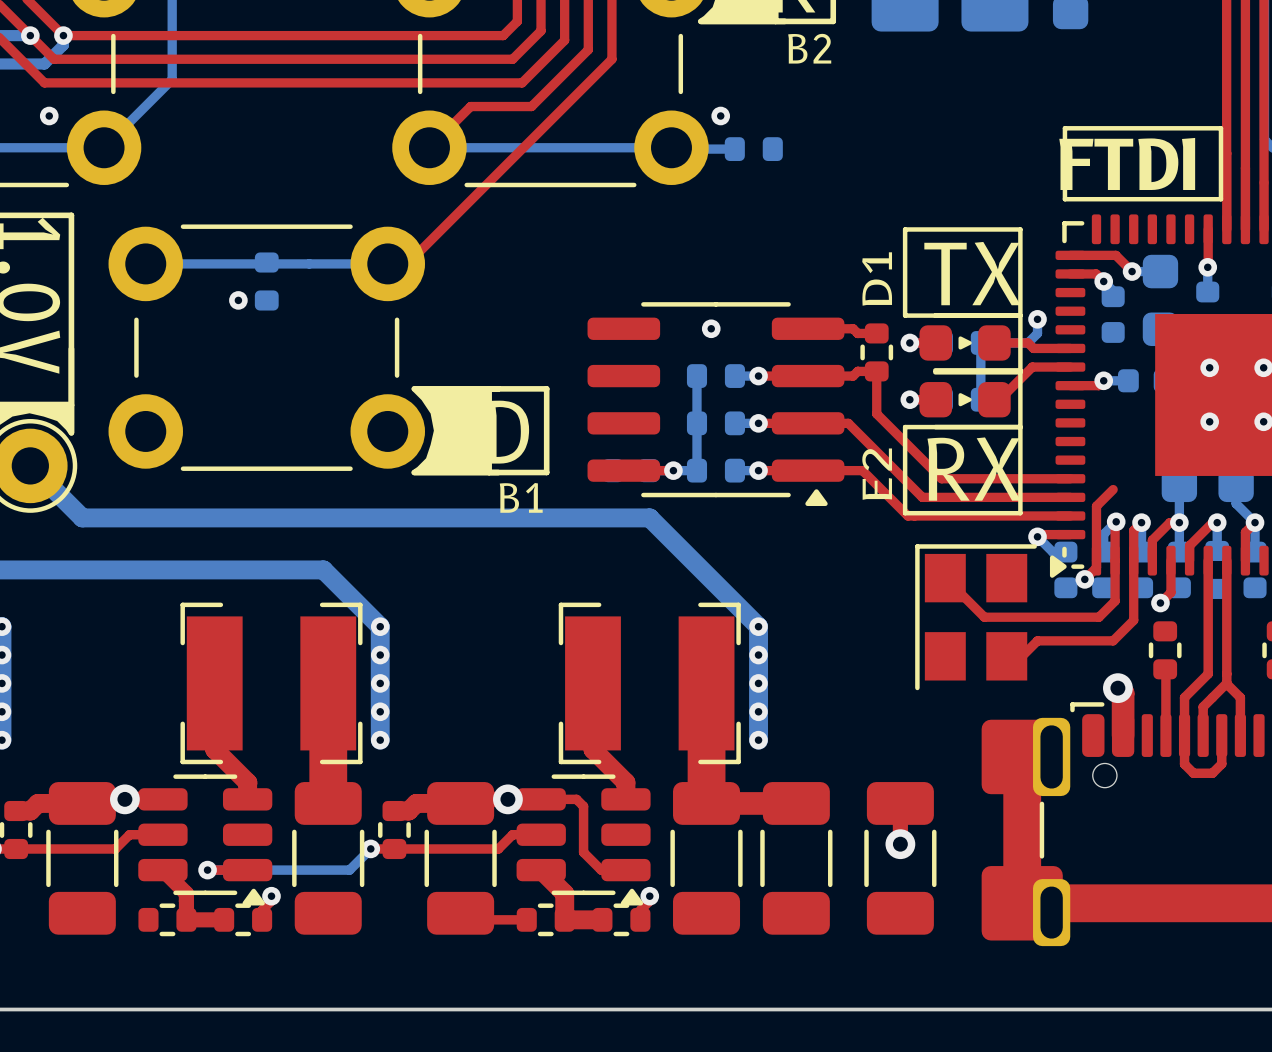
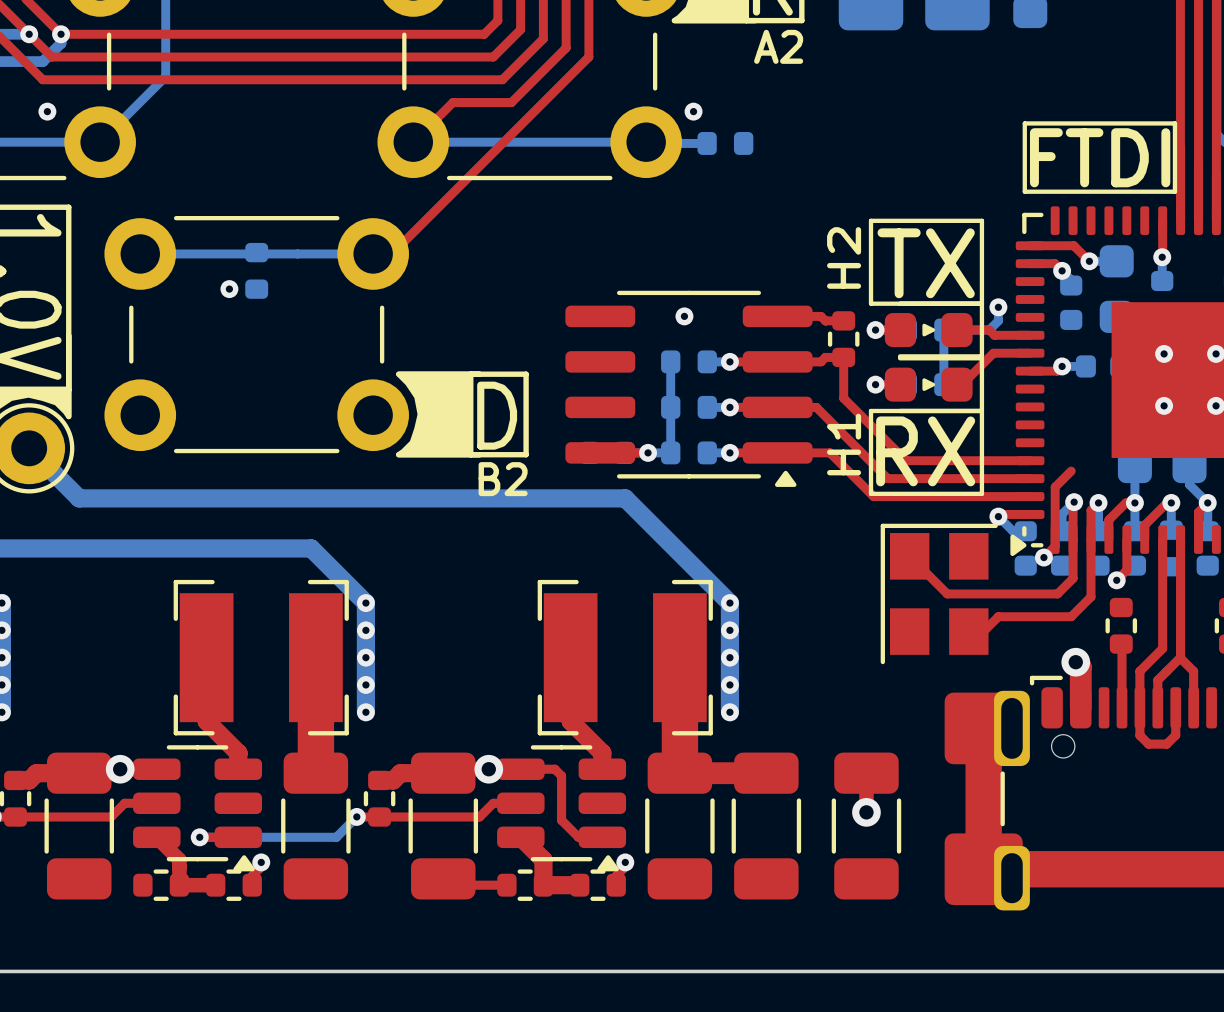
text: B2 (809, 48) -> A2 (778, 46)
text: D1 (877, 279) -> H2 (844, 257)
text: E2 (877, 474) -> H1 (844, 444)
text: B1 (521, 497) -> B2 (503, 479)

